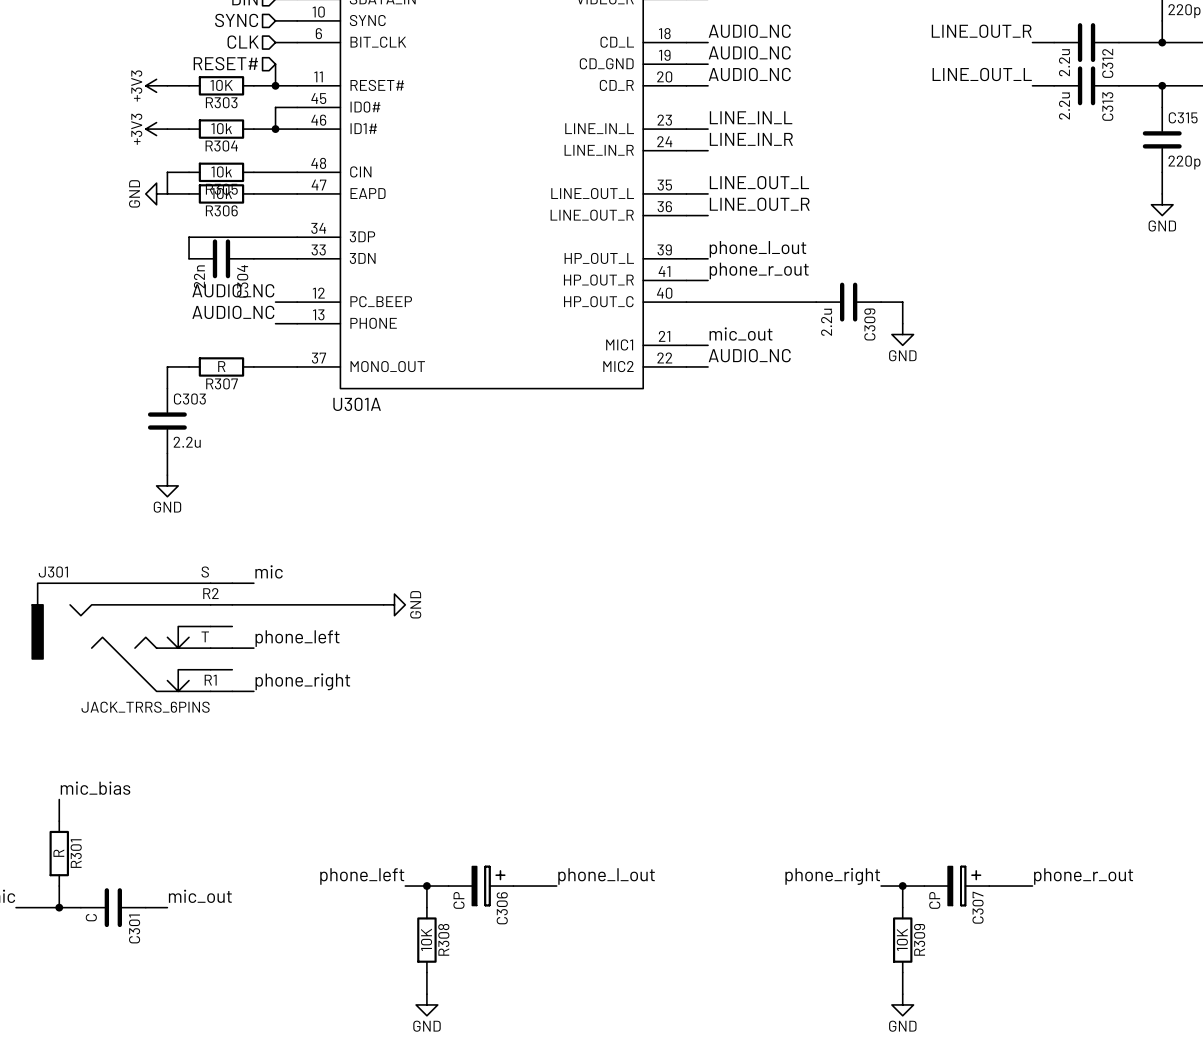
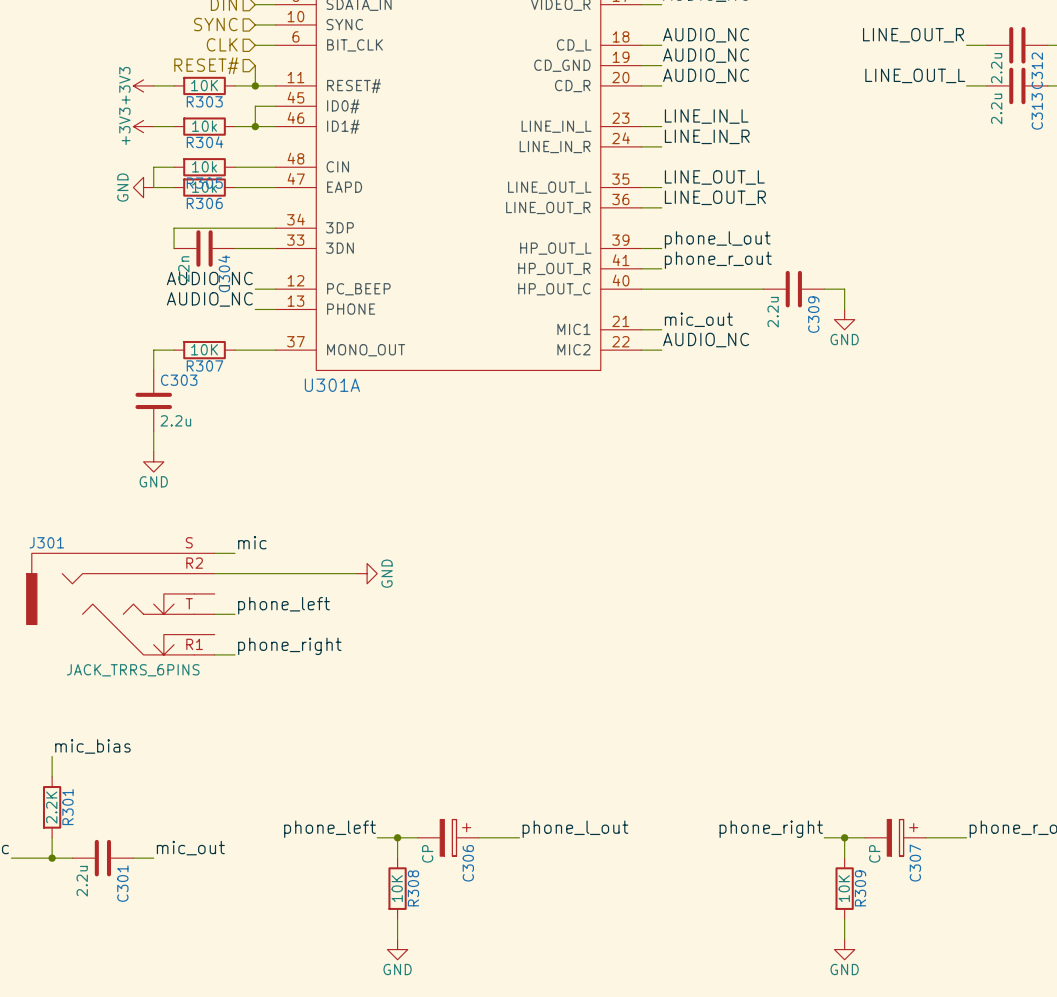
R307 value: R (221, 366) -> 10K (204, 349)
R301 value: R (58, 853) -> 2.2K (51, 807)
C301 value: C (91, 917) -> 2.2u (82, 881)

